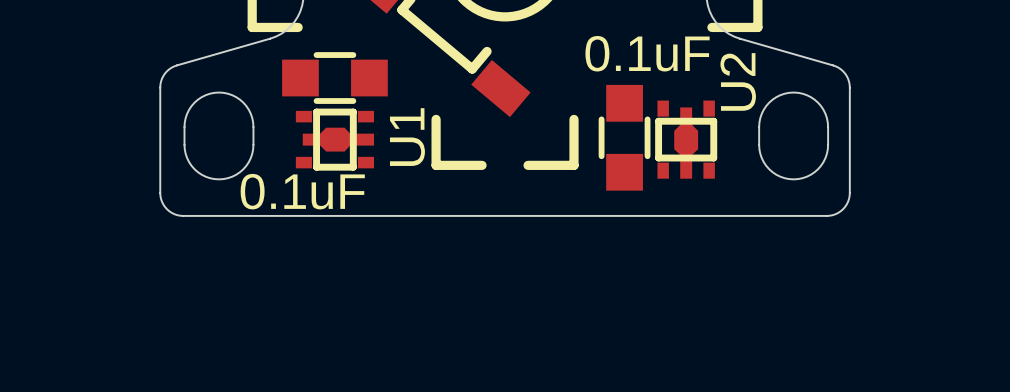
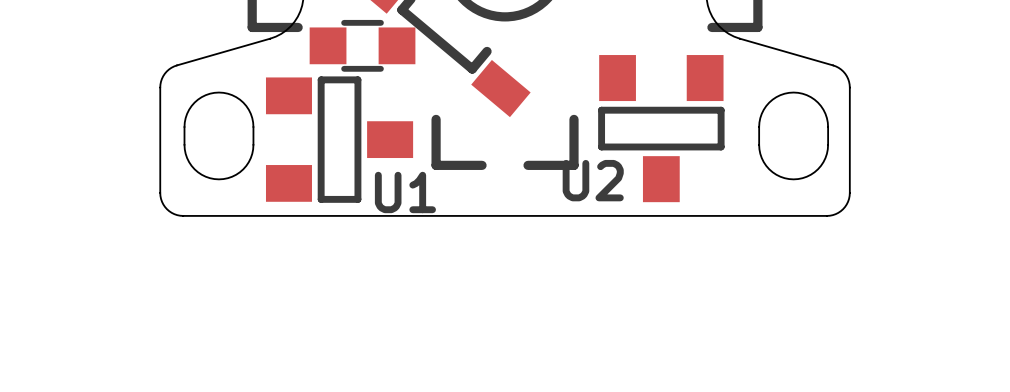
part position: (334, 78) -> (362, 45)
U2 name position: U2 (738, 81) -> U2 (593, 180)
U2 footprint: [655, 100, 718, 179] -> [598, 55, 725, 203]
U1 footprint: [295, 108, 375, 171] -> [265, 76, 414, 203]
U1 name rotation: 0° (407, 137) -> 90° clockwise (405, 192)
part: 0.1uF (624, 137) -> none
part value: 0.1uF (302, 191) -> none

